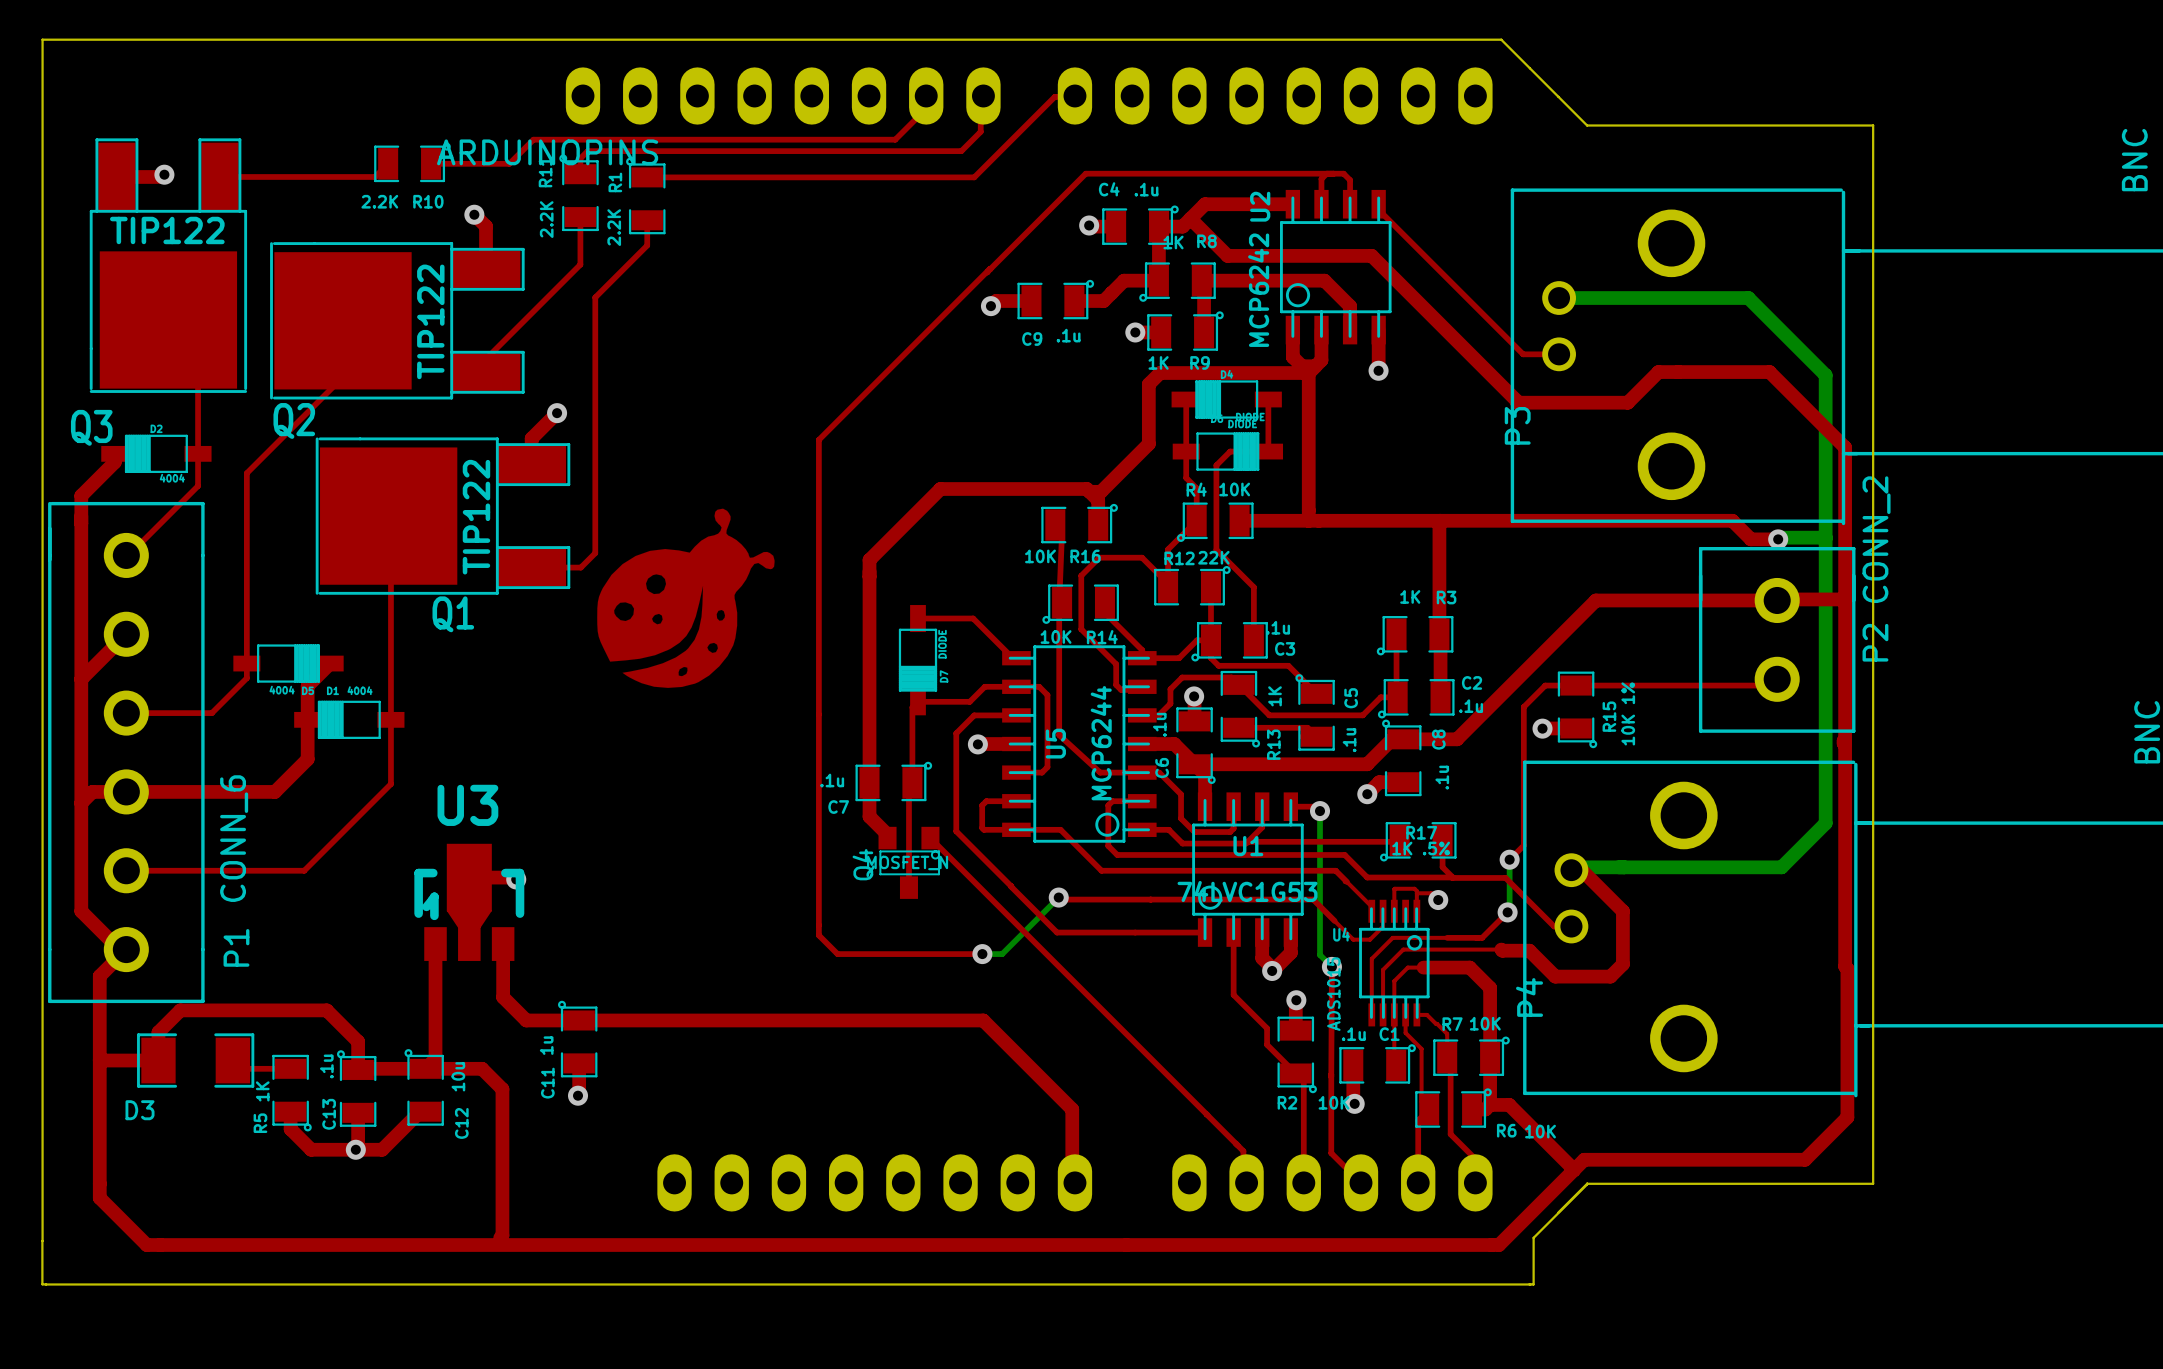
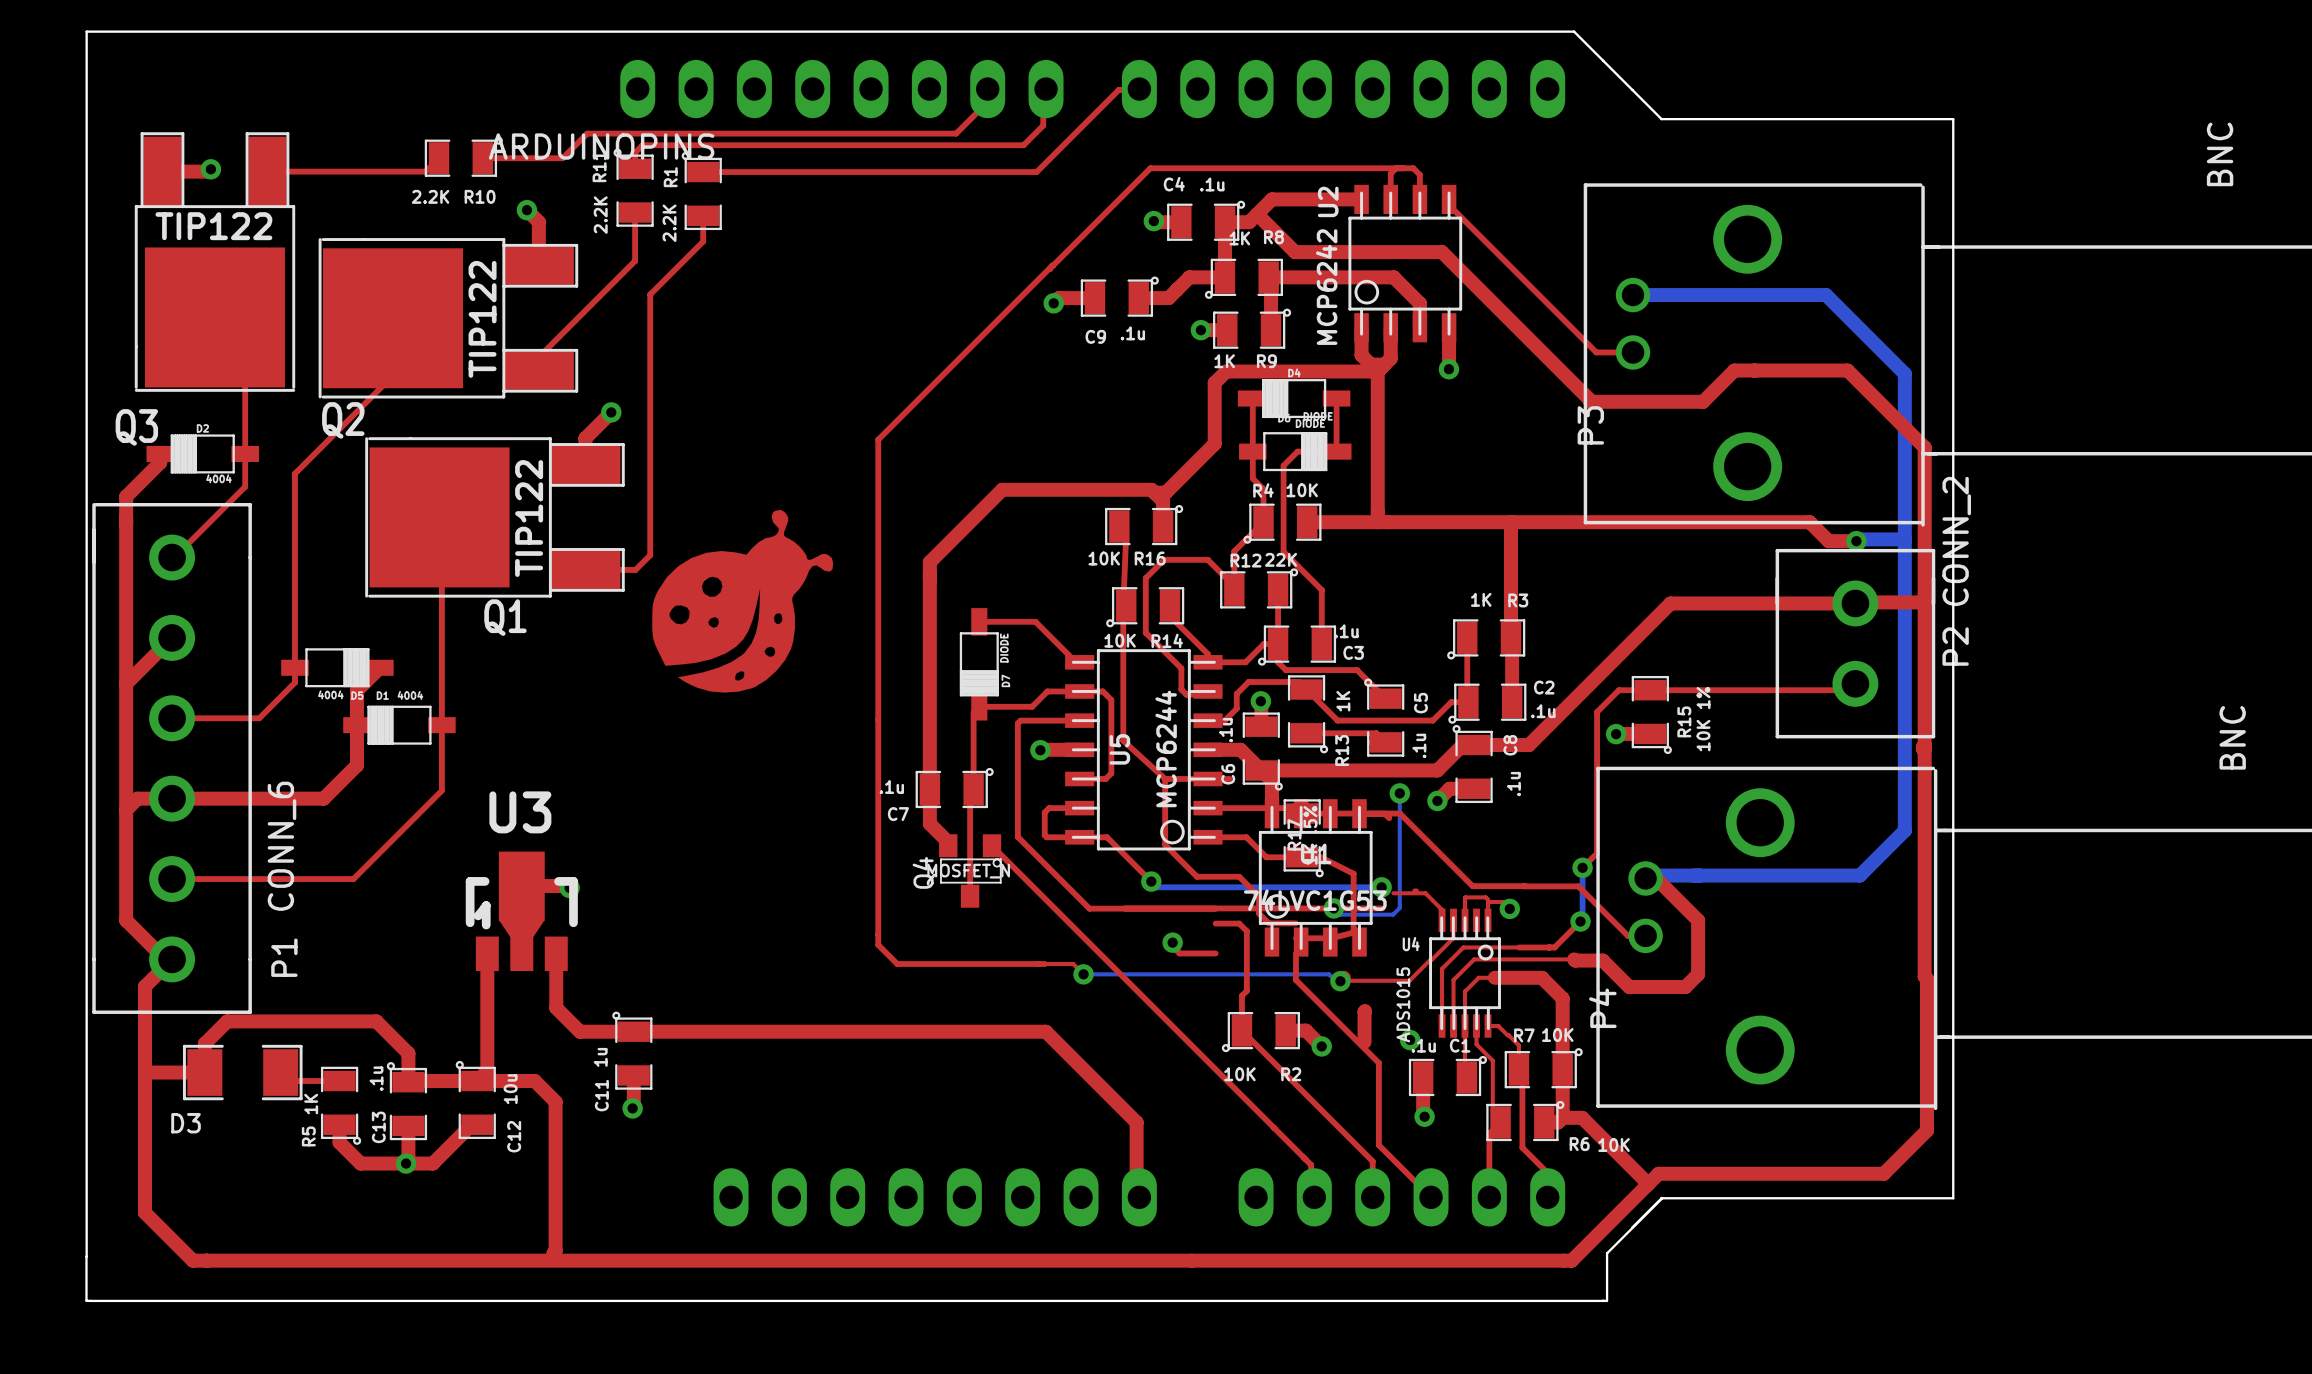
top track: (974, 715) (956, 733) (956, 831) (1011, 886) -> (1036, 720) (1020, 720) (1017, 723) (1017, 837) (1089, 908) (1215, 908)
top track: none -> (1165, 778) (1165, 844) (1197, 876) (1239, 876) (1259, 896) (1259, 913) (1268, 923) (1295, 923)
top track: (1159, 772) (1181, 794) (1181, 818) (1194, 832) (1230, 832) (1233, 828) (1233, 806) -> (1225, 778) (1229, 778)
bottom track: none -> (1399, 793) (1399, 907) (1393, 914) (1340, 914) (1333, 908)
top track: (1142, 801) (1112, 801) (1108, 805) (1108, 845) (1117, 854) (1344, 854) (1367, 877) (1452, 877) -> (1208, 808) (1296, 808) (1302, 813) (1399, 813) (1472, 886) (1524, 886)
top track: (1262, 806) (1262, 827) (1246, 843) (1182, 843) (1168, 829) -> (1295, 938) (1331, 938) (1353, 932) (1353, 873) (1320, 857) (1266, 857) (1246, 837) (1235, 837)
bottom track: (1320, 811) (1320, 954) (1331, 966) -> none
via position: (1320, 811) -> (1399, 793)
top track: (1043, 829) (1060, 829) (1101, 870) (1335, 870) (1371, 906) -> (1393, 893) (1425, 893) (1442, 909) (1442, 915)
top track: none -> (1107, 837) (1151, 881)
top track: (1396, 836) (1399, 840) (1398, 841) (1247, 841) -> none
top track: (1442, 840) (1442, 867) (1452, 877) -> none
R17 rotation: 0° (1418, 841) -> 90° counterclockwise (1303, 838)
R17 position: (1418, 841) -> (1303, 838)
bottom track: none -> (1151, 881) (1157, 887) (1381, 887)
via: none -> (1151, 881)
via: none -> (1381, 887)
top track: (1011, 886) (1057, 932) (1205, 932) -> none
bottom track: (1058, 897) (1002, 954) (982, 954) -> none
via: (1058, 897) -> none
via: none -> (1333, 908)
top track: (1313, 899) (1353, 939) (1370, 939) (1383, 926) -> (1335, 980) (1409, 980) (1453, 936)
top track: (1233, 932) (1233, 994) (1267, 1028) (1267, 1044) (1303, 1081) (1303, 1147) -> (1215, 923) (1239, 923) (1246, 931) (1246, 990) (1241, 995) (1241, 1030) (1372, 1161)
top track: (1262, 932) (1262, 958) (1271, 967) (1276, 967) (1290, 952) (1290, 932) -> none
via: none -> (1172, 942)
top track: none -> (1175, 949) (1179, 953) (1215, 953)
top track: none -> (1044, 964) (1073, 964) (1083, 974)
via: (982, 954) -> none
bottom track: none -> (1083, 974) (1329, 974) (1335, 980)
via: none -> (1083, 974)
top track: (1331, 966) (1331, 1076) -> none
via: (1331, 966) -> none
via: (1296, 1000) -> none
top track: none -> (1285, 1030) (1305, 1030) (1321, 1046)
via: none -> (1410, 1040)
via: none -> (1321, 1046)
R2 rotation: 0° (1297, 1054) -> 90° clockwise (1260, 1032)
R2 position: (1297, 1054) -> (1260, 1032)
top track: (1331, 1074) (1331, 1153) -> (1295, 953) (1295, 980) (1378, 1062) (1378, 1145) (1400, 1167)

